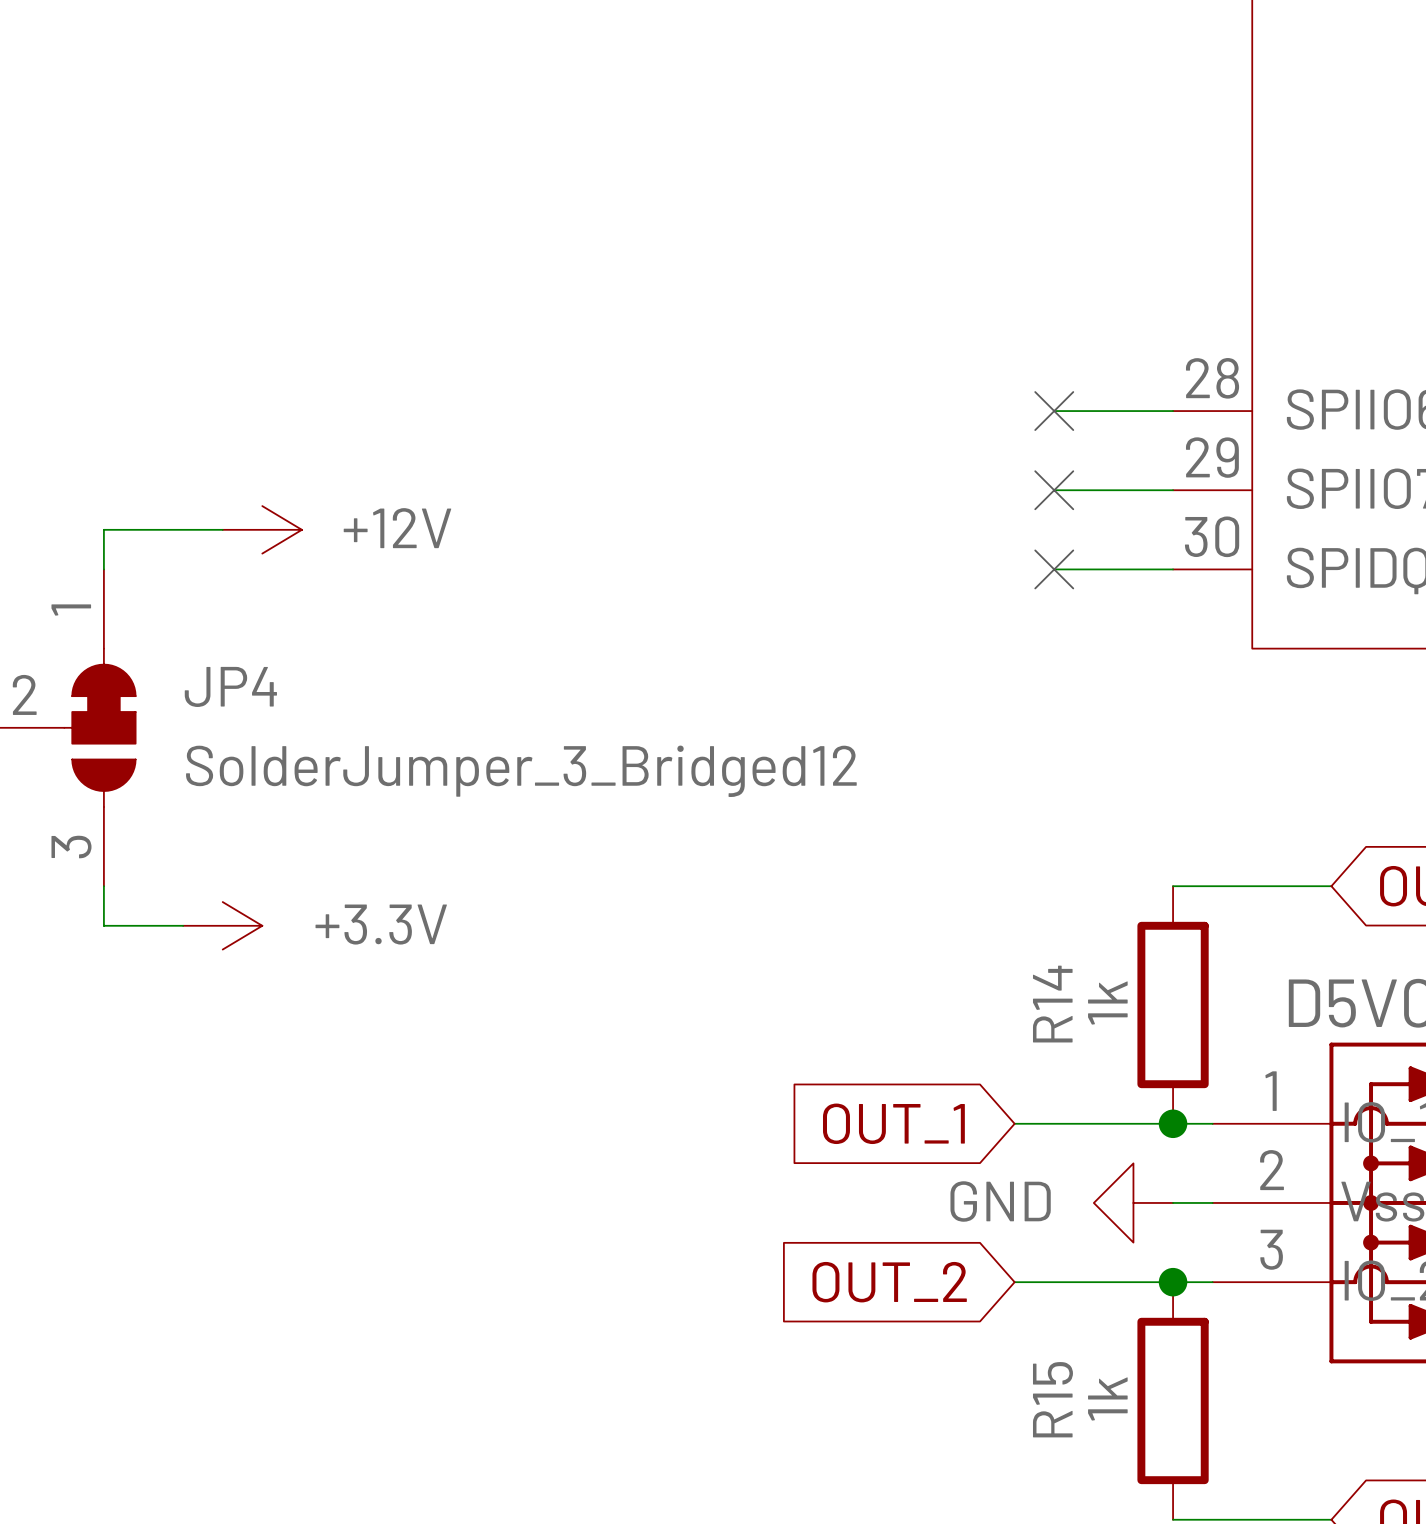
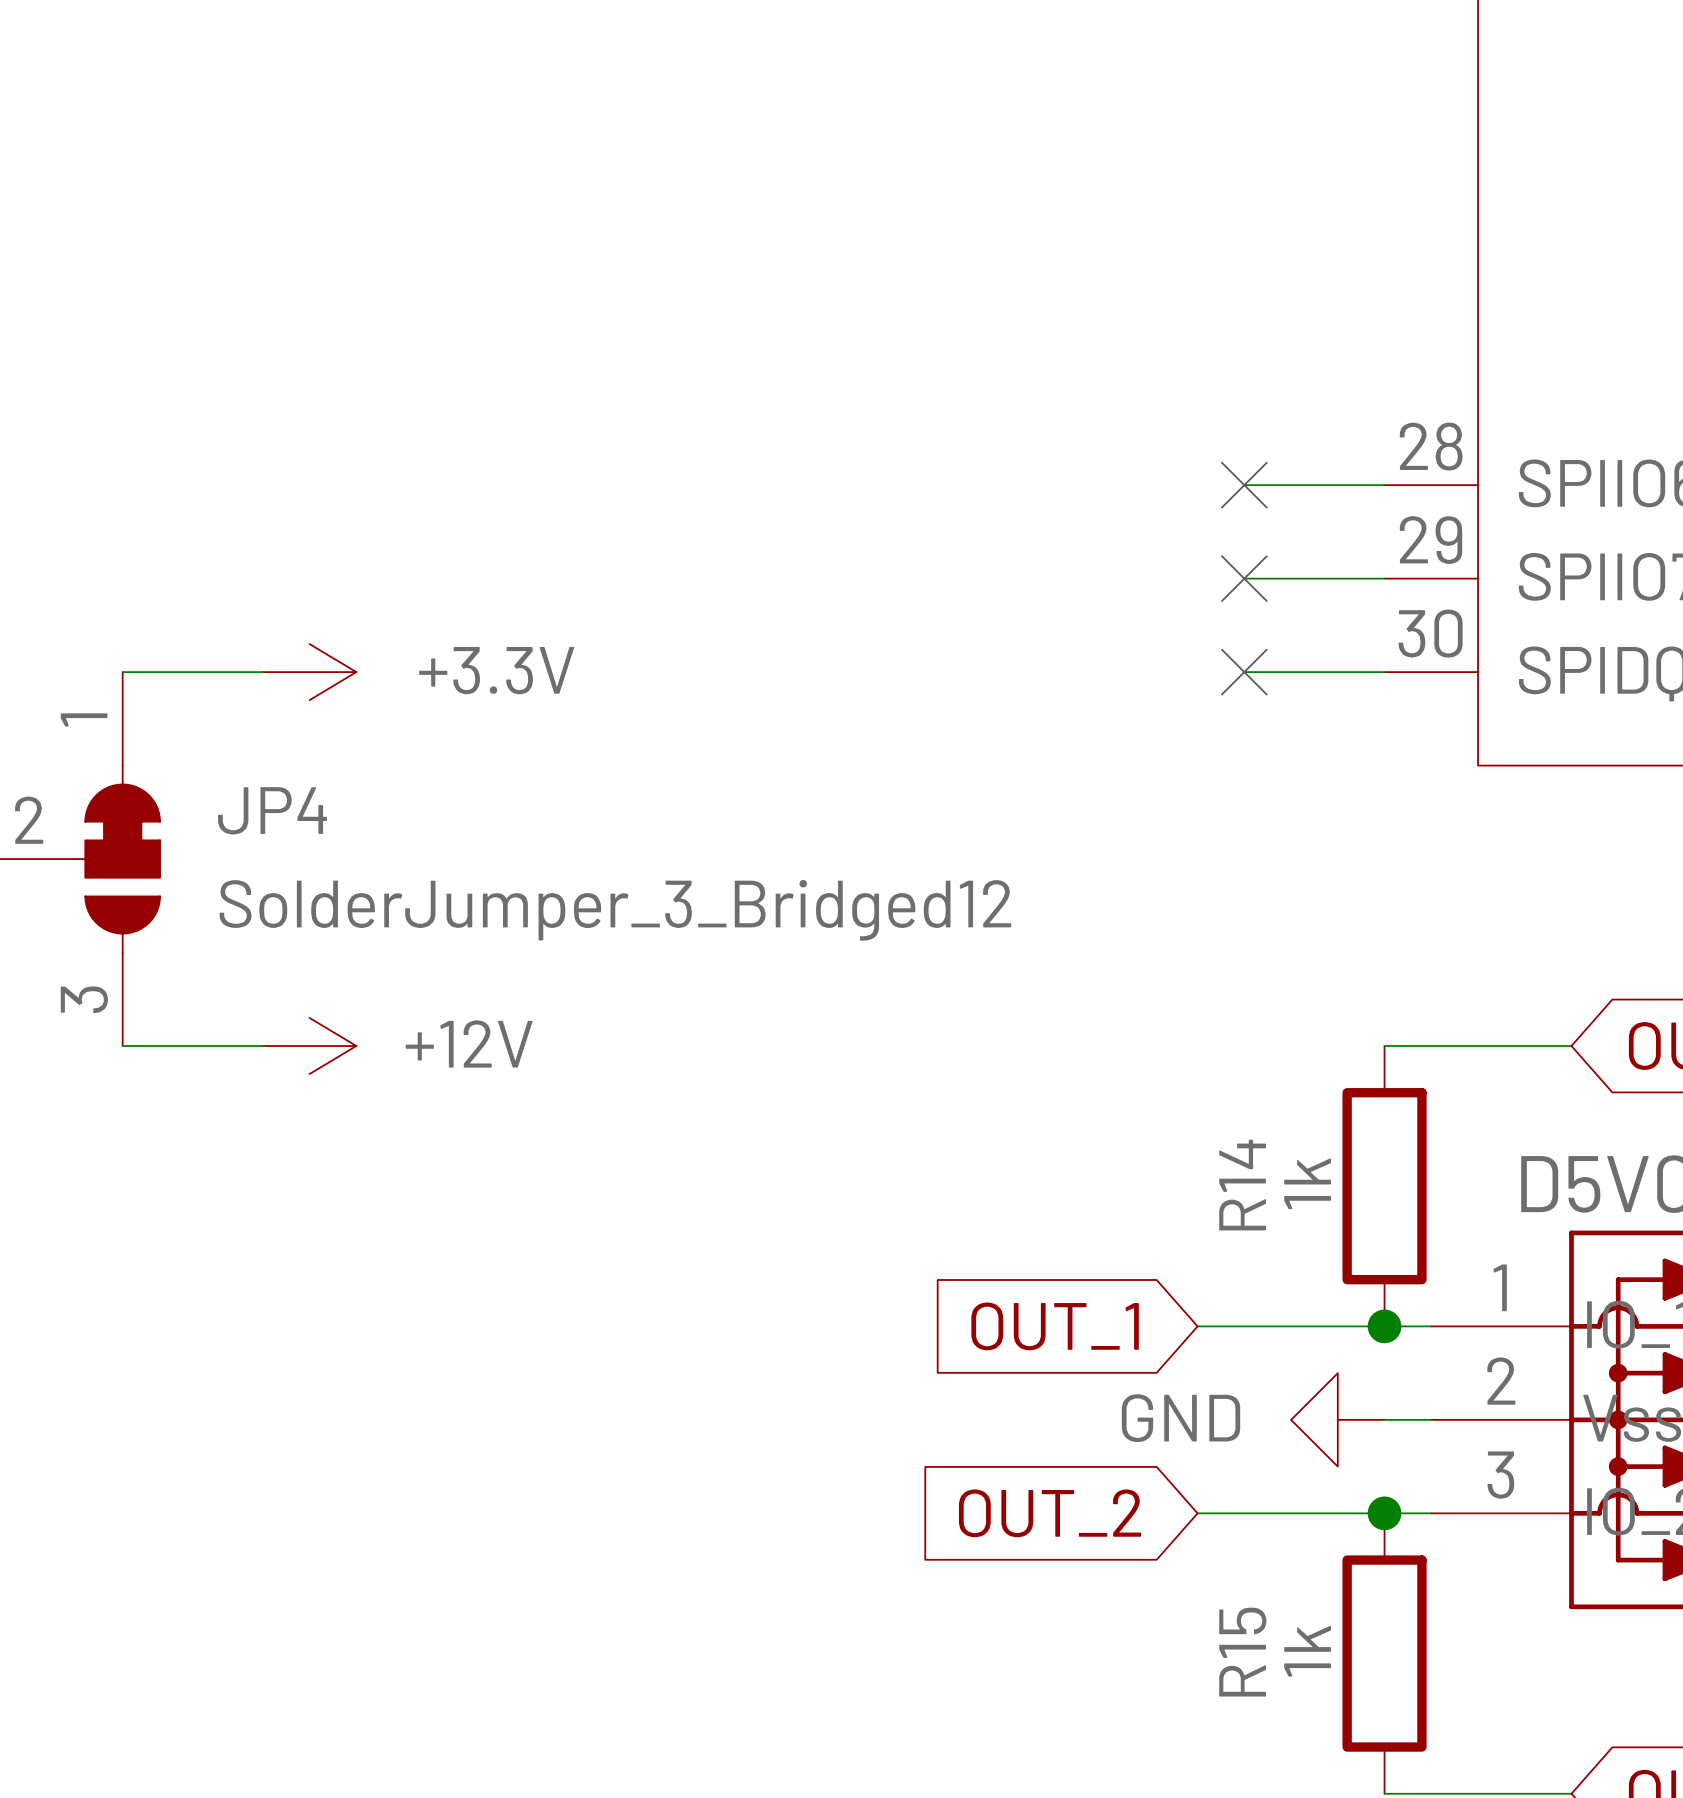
wire: (222, 529) (103, 529) (103, 569) -> (262, 672) (122, 672)
power symbol position: +12V (262, 529) -> +12V (309, 1045)
wire: (103, 886) (103, 925) (183, 925) -> (122, 1045) (262, 1045)
power symbol position: +3.3V (222, 925) -> +3.3V (309, 672)

